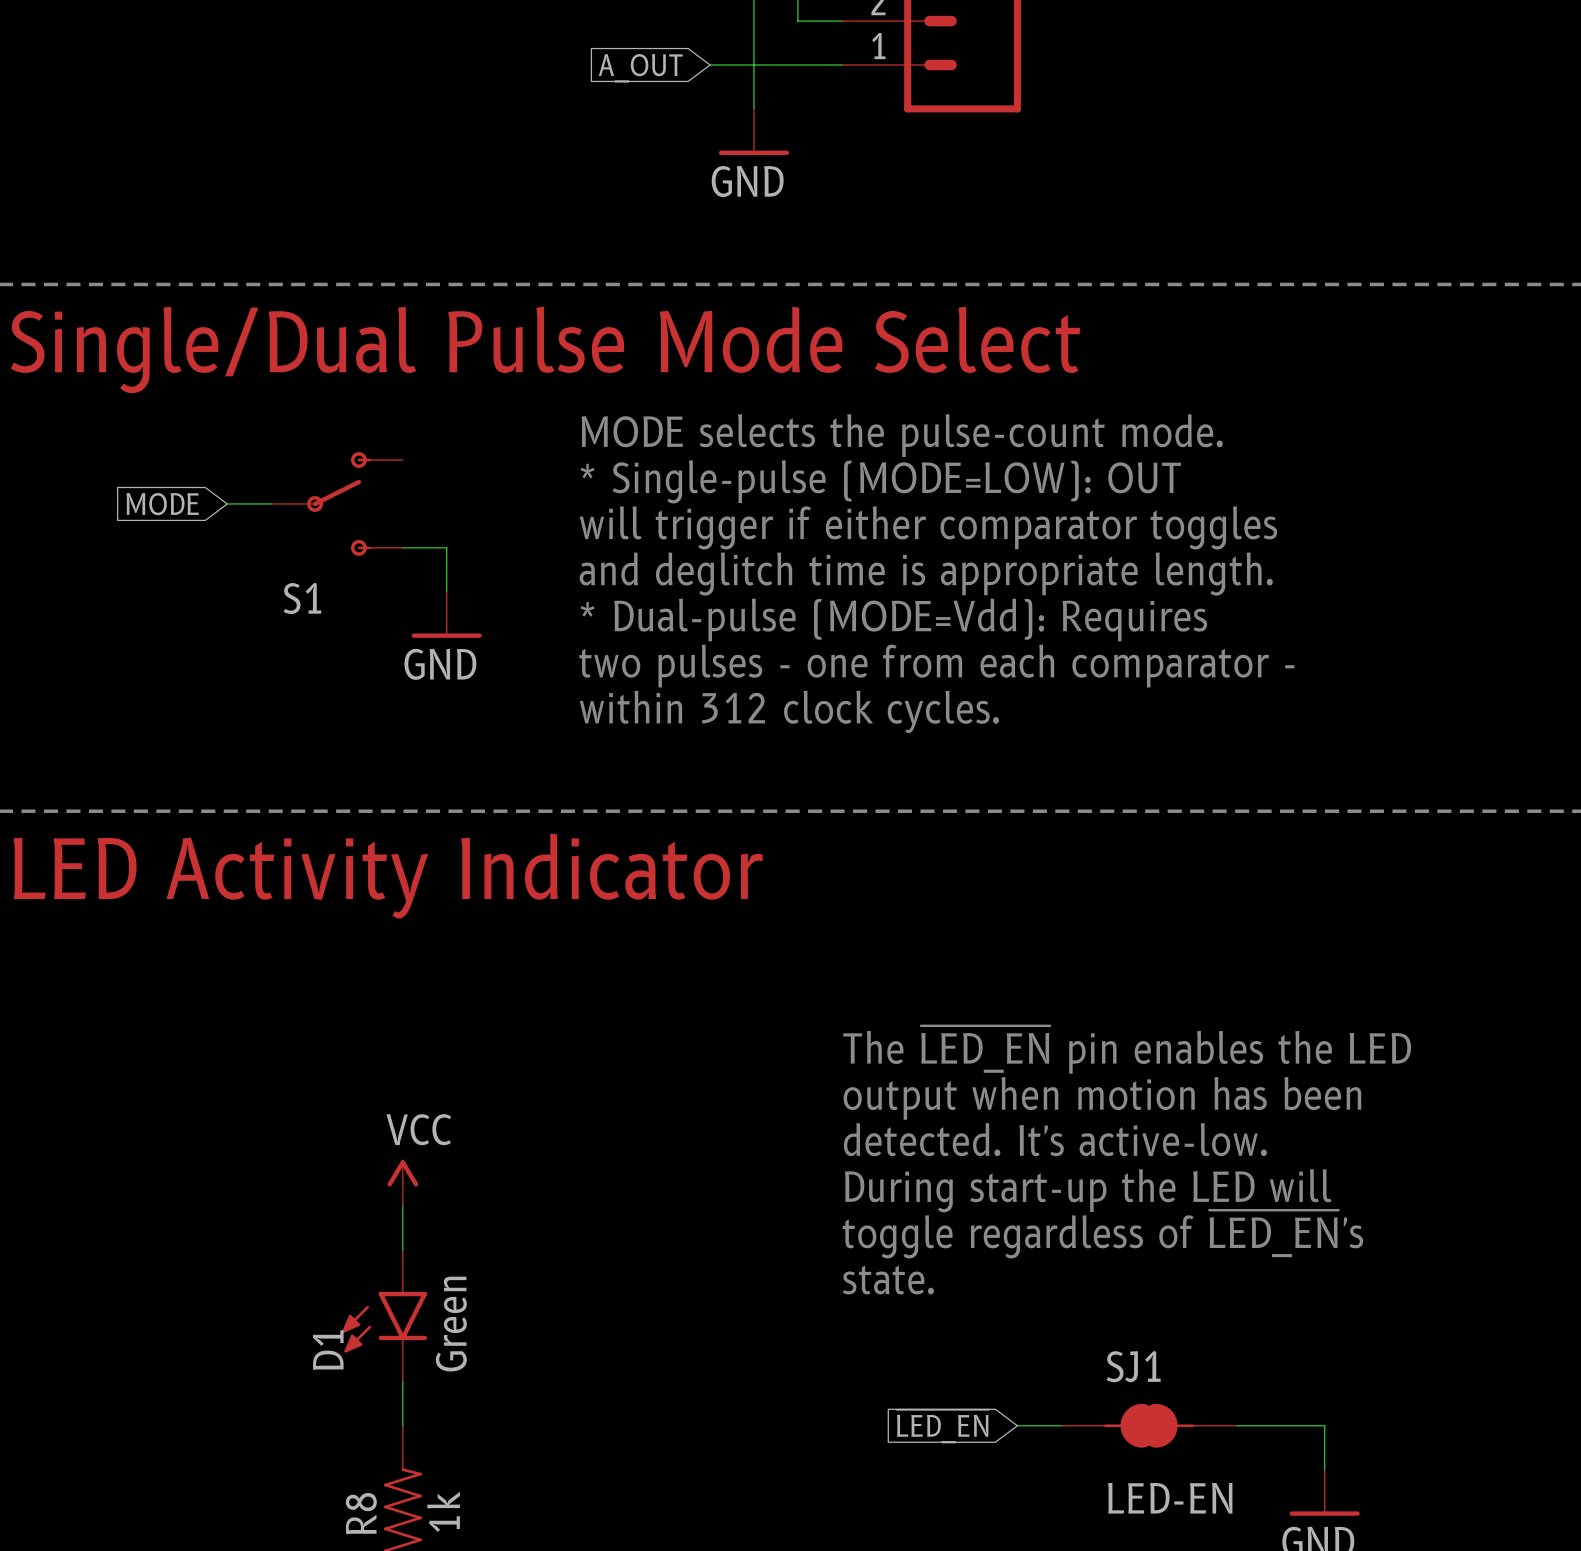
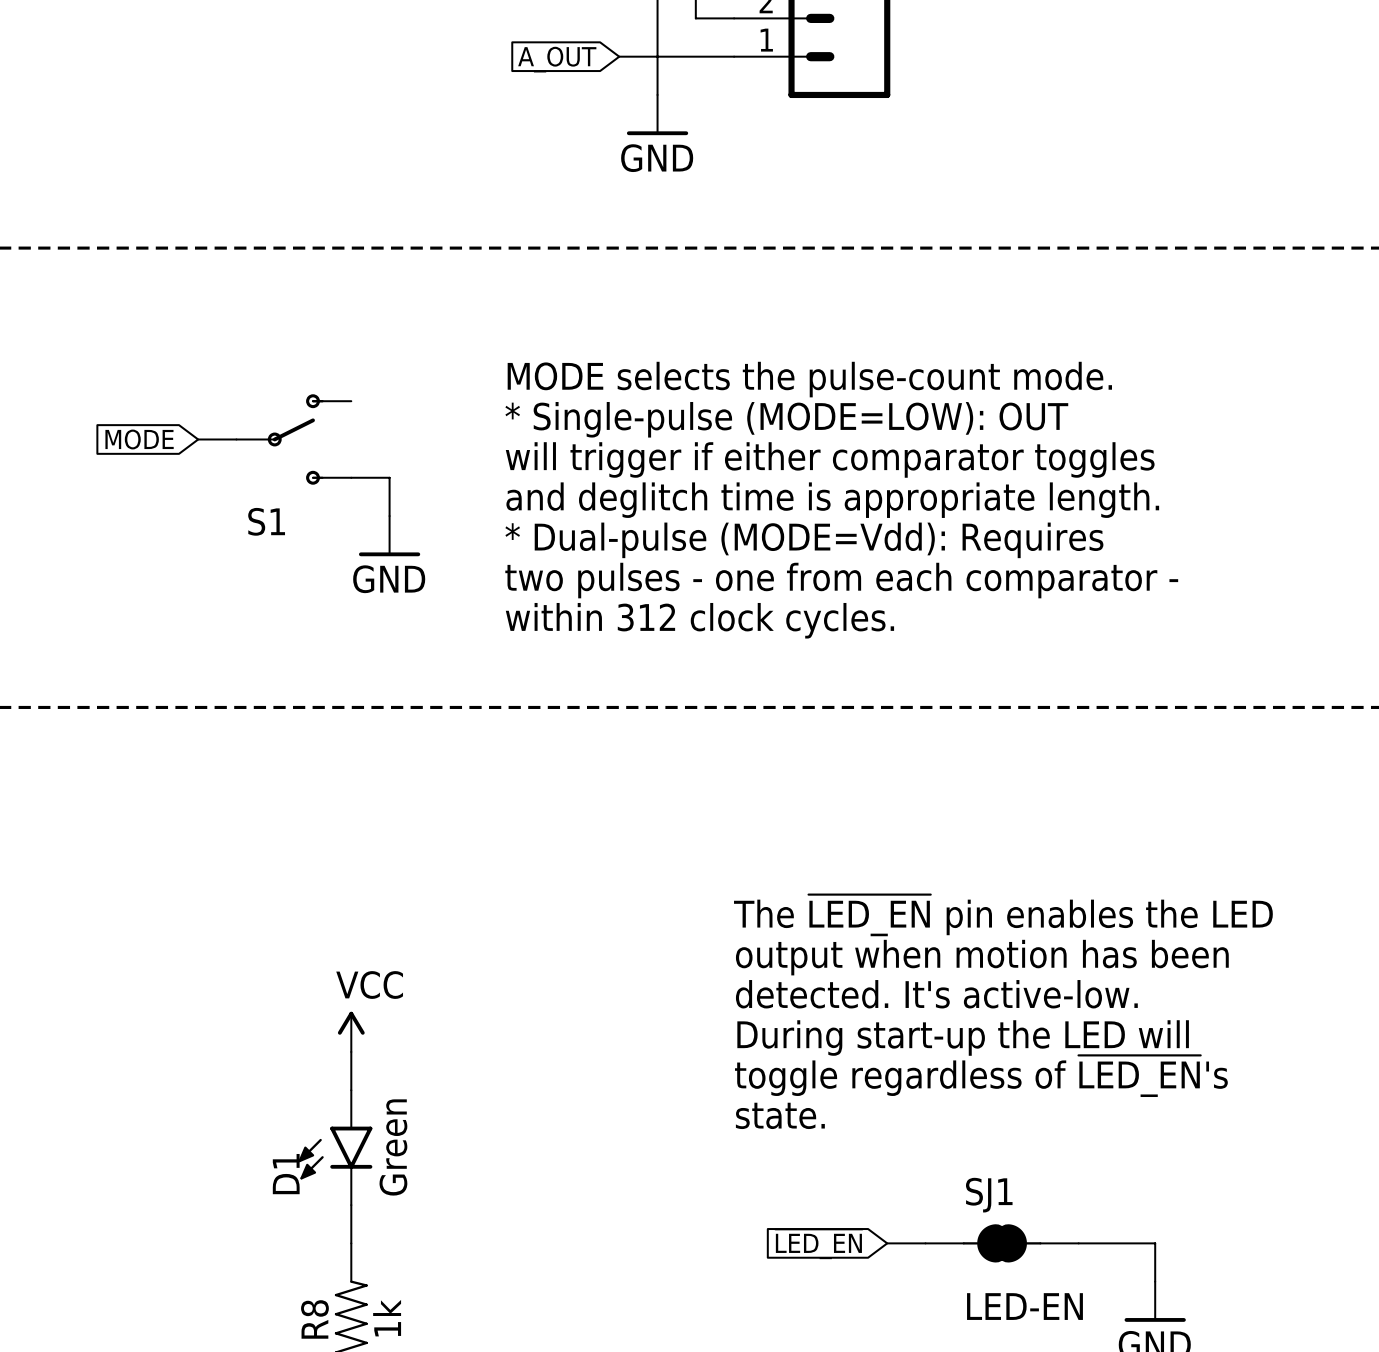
text: Single/Dual Pulse Mode Select (545, 349) -> none
text: LED Activity Indicator (388, 875) -> none

